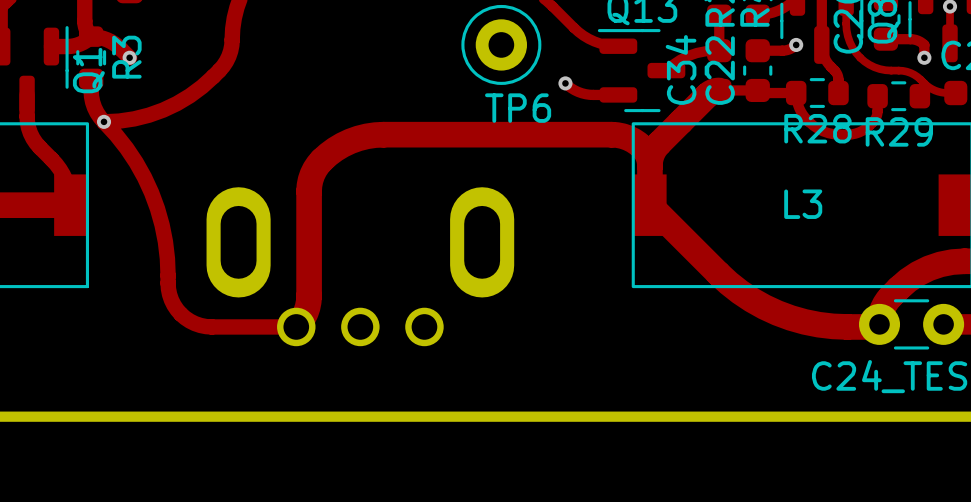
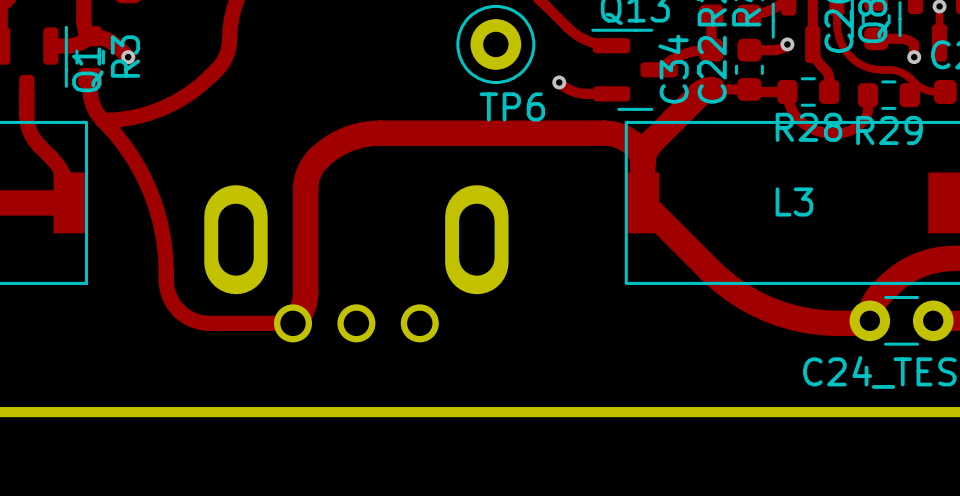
via: (103, 121) -> none

